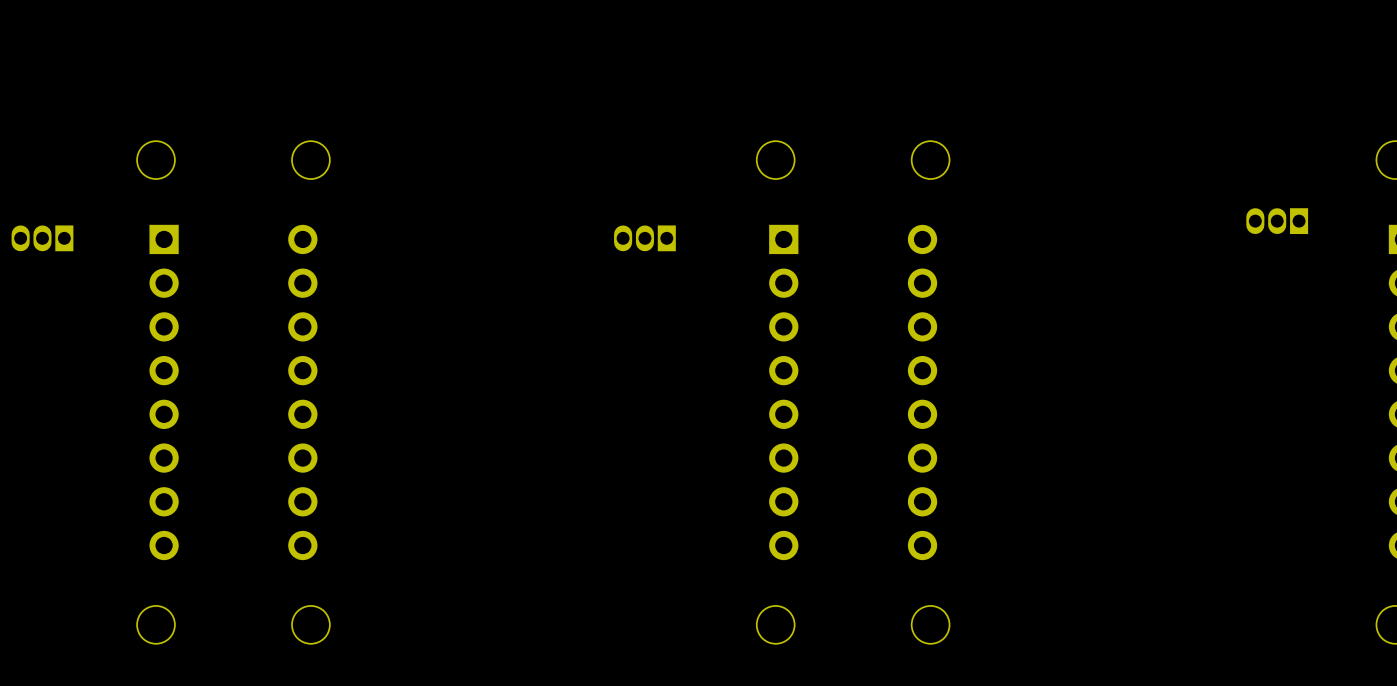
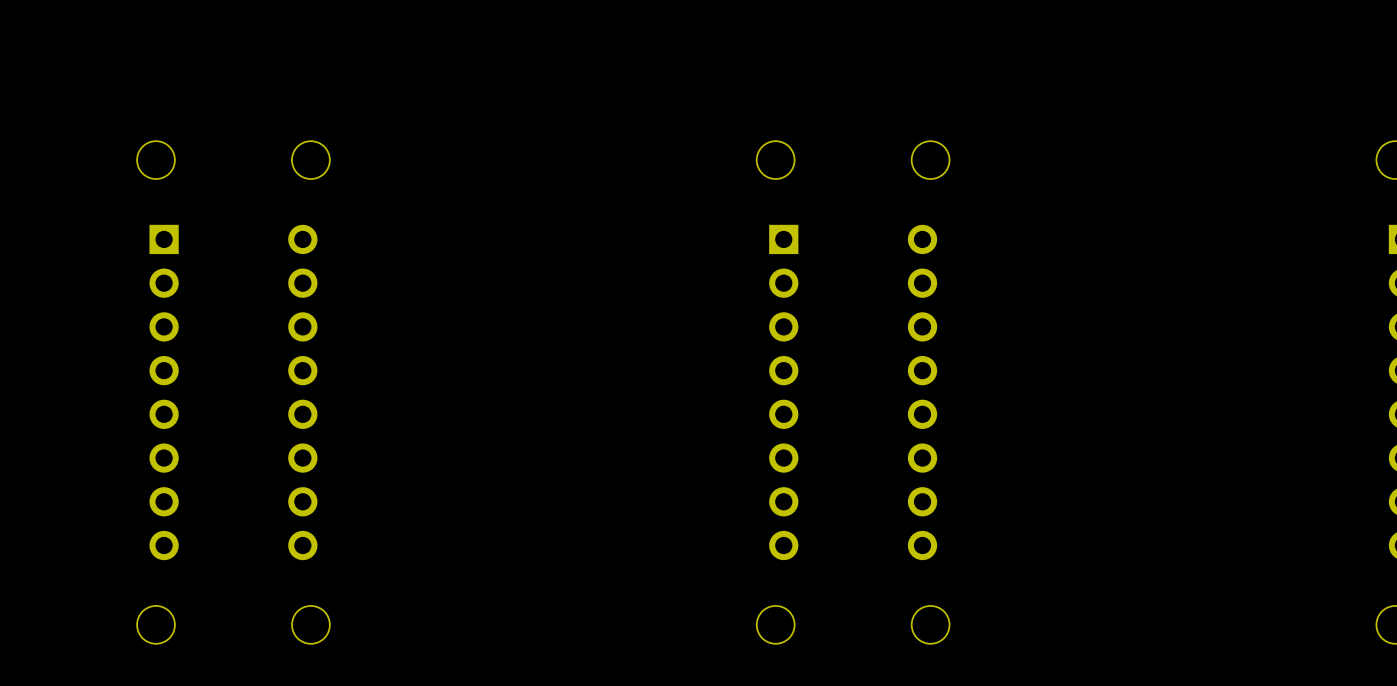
part: (1277, 221) -> none
part: (42, 238) -> none
part: (644, 238) -> none

